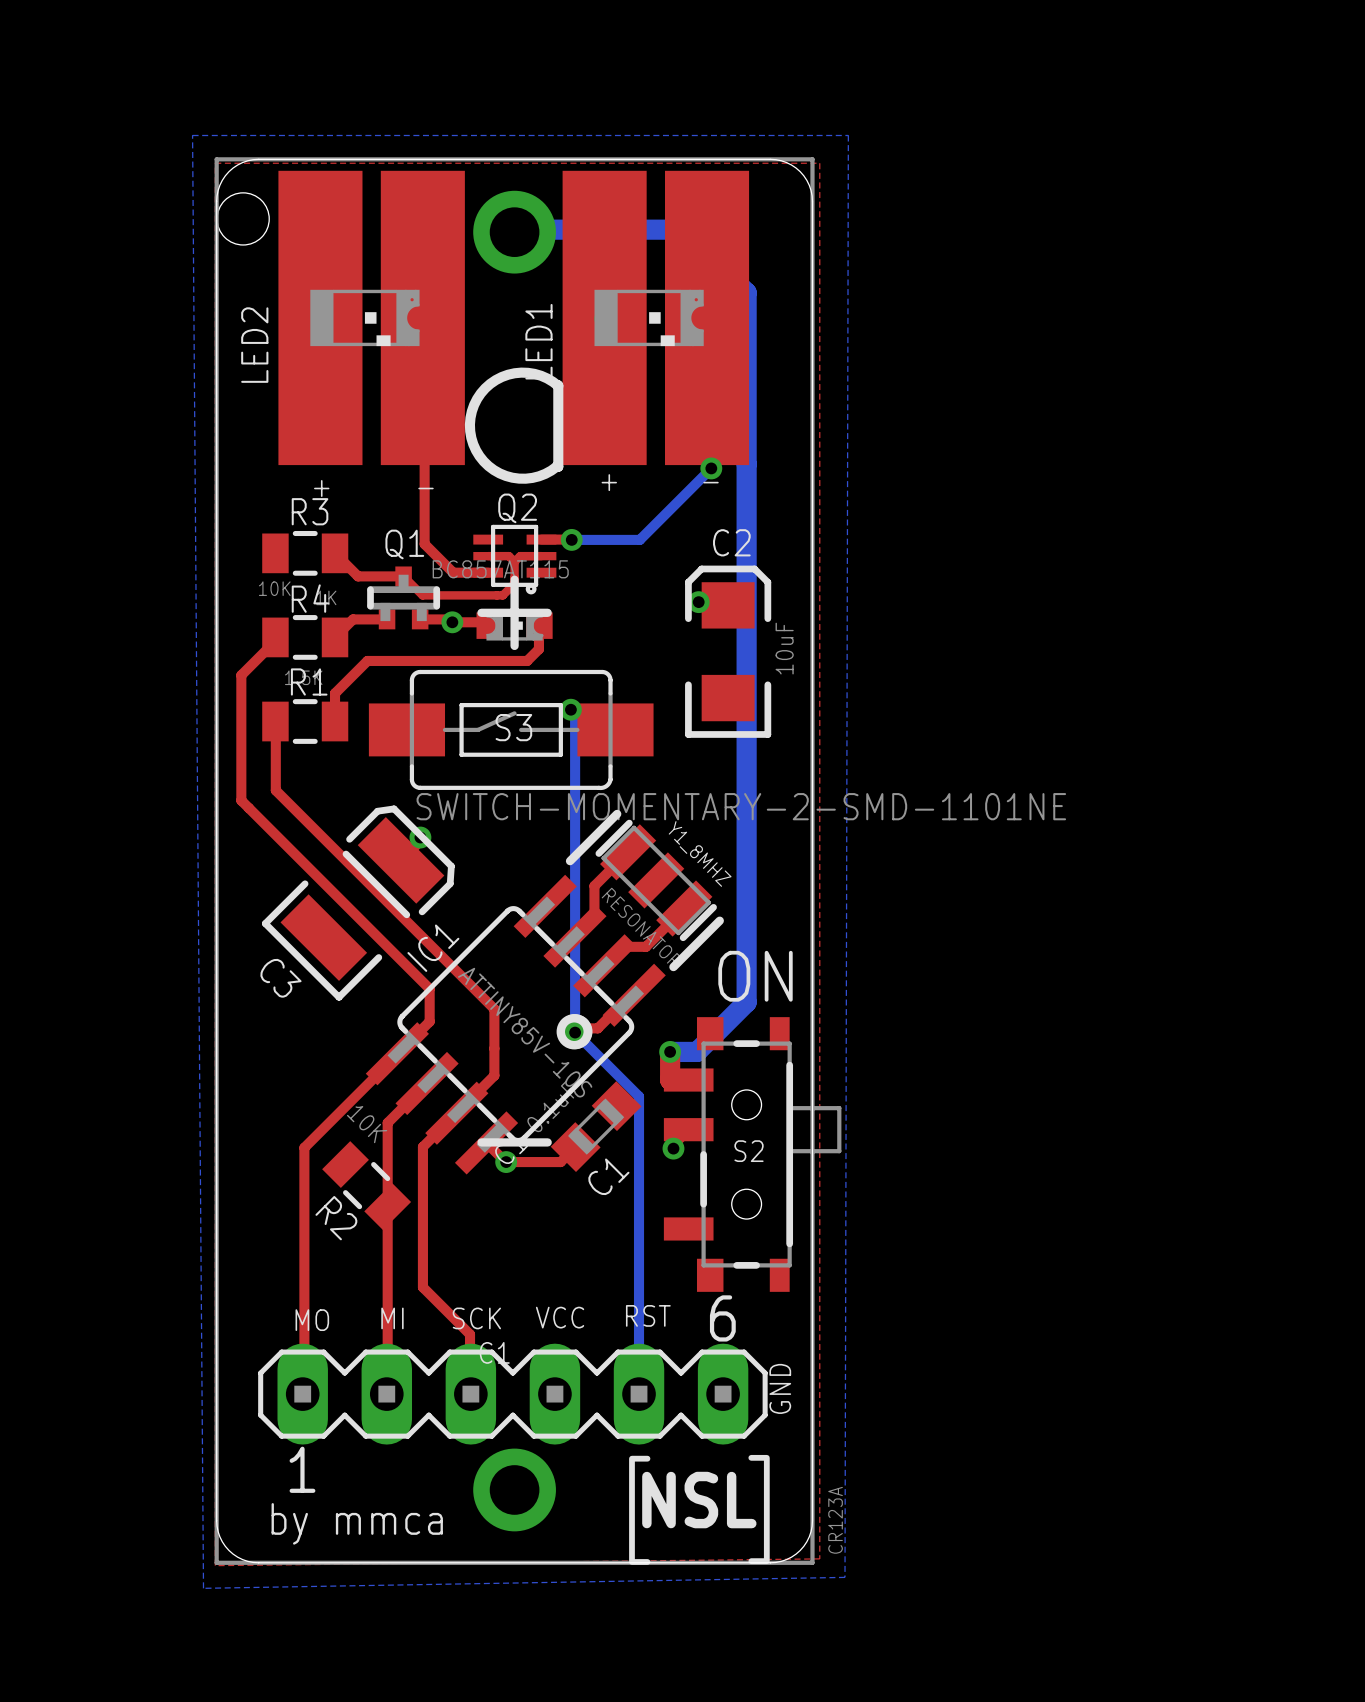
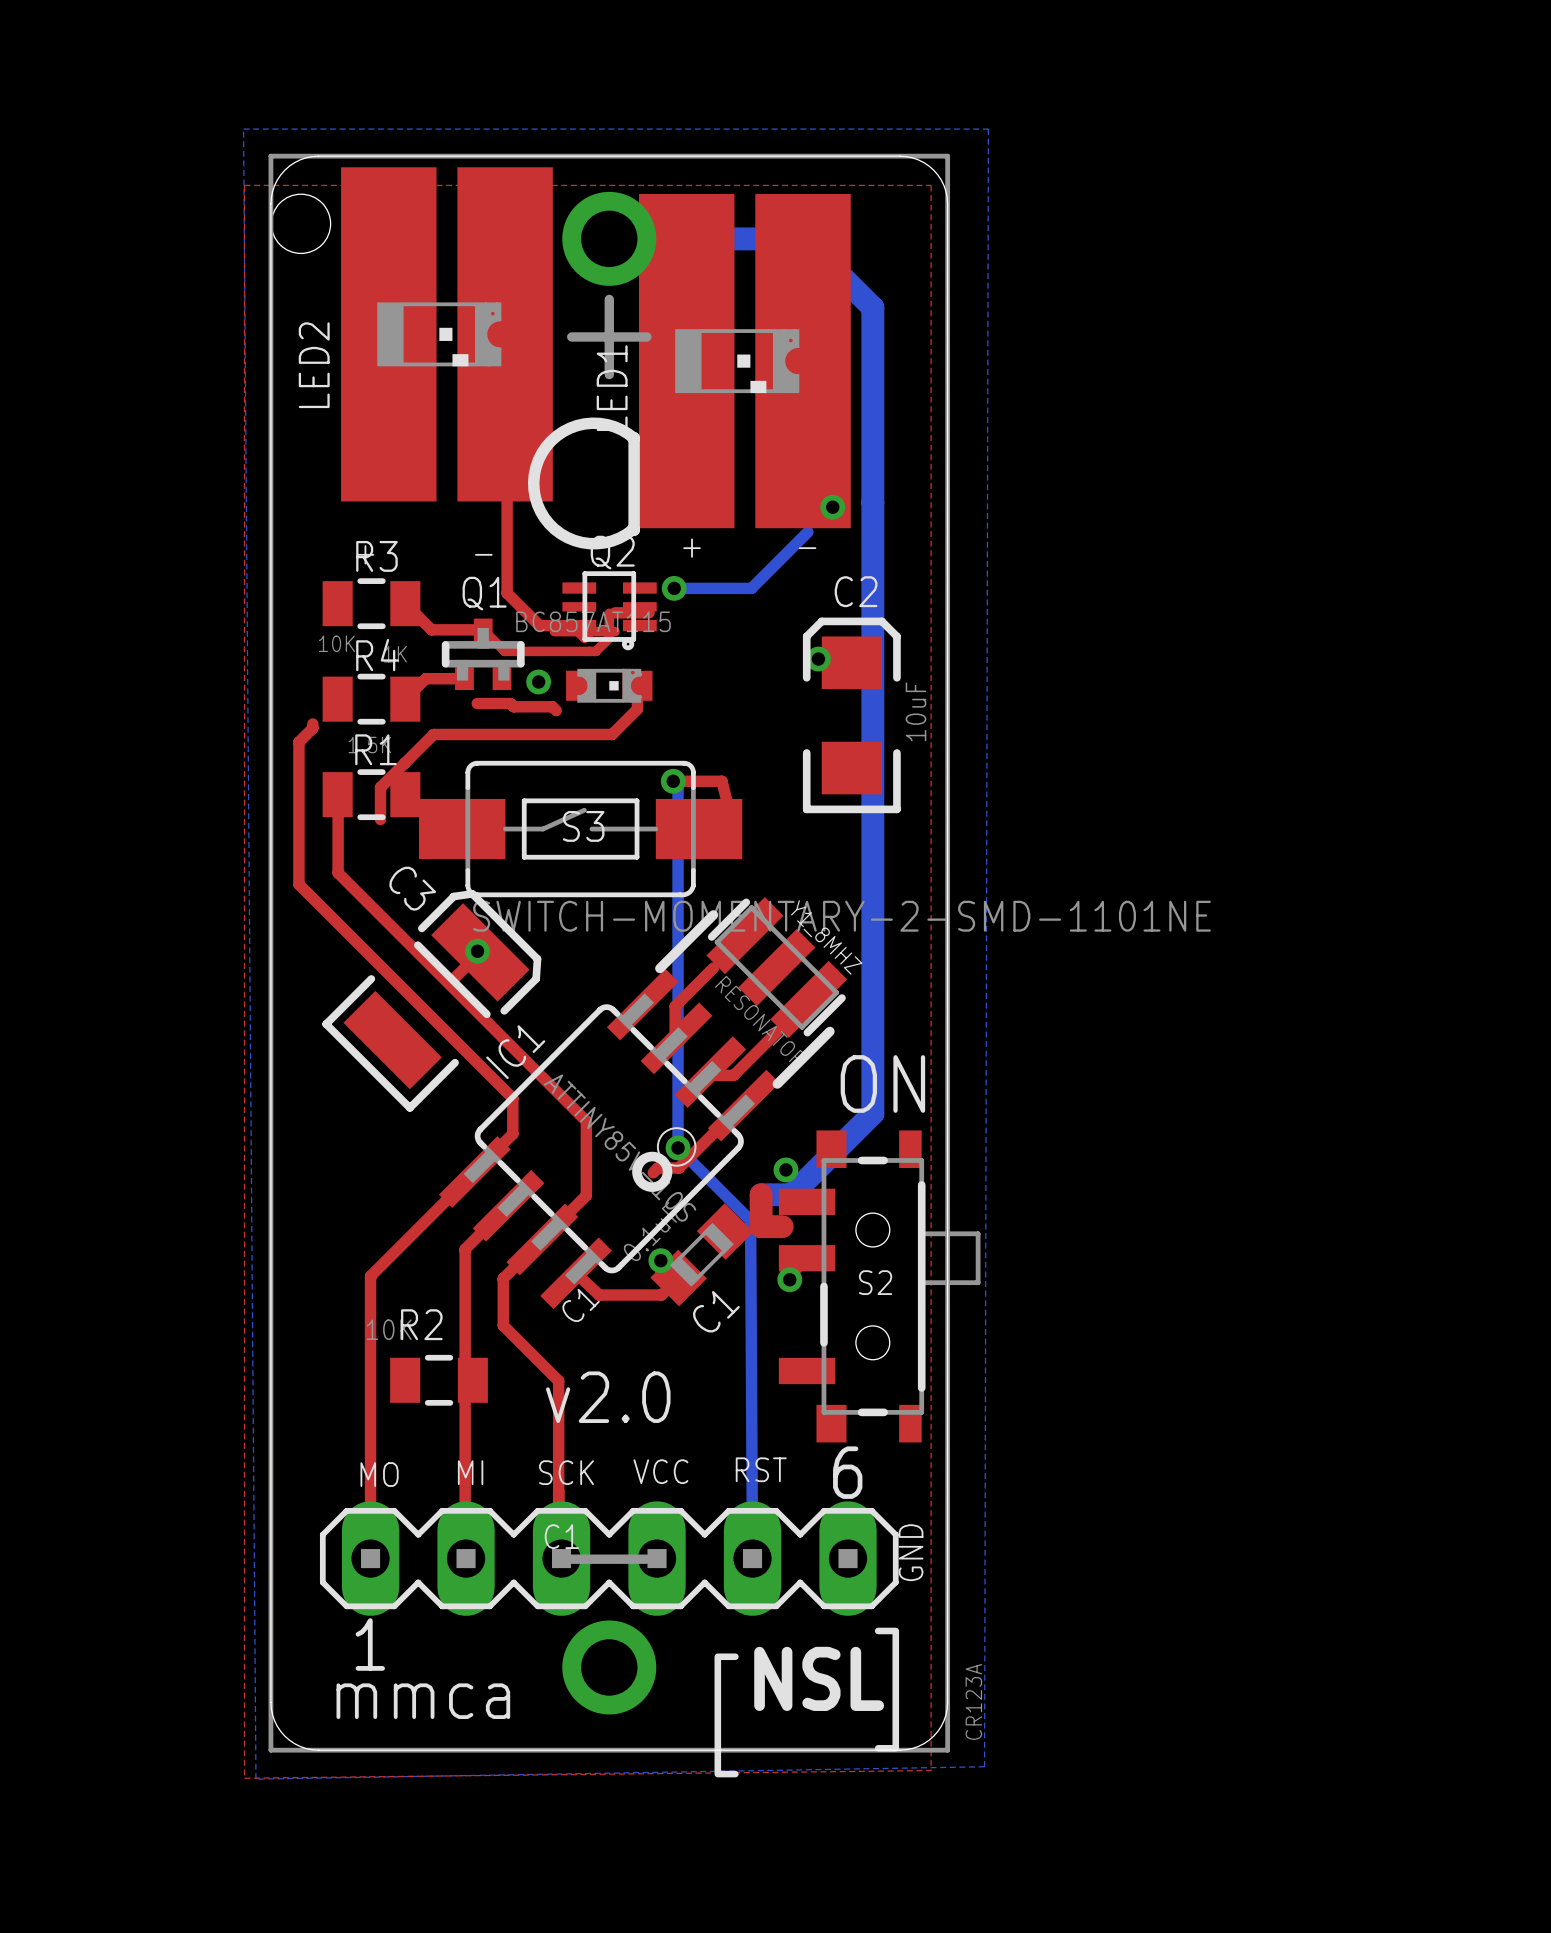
bottom zone outline: (192, 135) (848, 135) (845, 1577) (203, 1588) (192, 135) -> (243, 129) (988, 129) (984, 1766) (255, 1779) (243, 129)
part footprint: [214, 157, 815, 1565] -> [268, 153, 951, 1753]
board edge: (258, 159) (770, 159) (791, 164) (803, 175) (809, 185) (812, 201) (812, 1520) (806, 1541) (796, 1554) (786, 1559) (770, 1562) (258, 1562) (237, 1557) (225, 1546) (219, 1536) (216, 1520) (216, 201) (219, 185) (228, 171) (242, 162) (258, 159) -> (318, 156) (899, 156) (912, 157) (923, 162) (937, 174) (944, 185) (947, 203) (947, 1702) (946, 1714) (941, 1726) (928, 1740) (918, 1746) (899, 1750) (318, 1750) (306, 1748) (294, 1743) (280, 1731) (274, 1720) (270, 1702) (270, 203) (274, 185) (284, 170) (300, 159) (318, 156)
bottom track: (514, 232) (517, 229) (683, 229) (746, 292) (746, 1002) -> (609, 238) (804, 238) (872, 307) (872, 1113) (848, 1138)
top track: none -> (505, 334) (507, 380) (507, 593) (539, 625) (579, 625)
LED2 position: (371, 317) -> (446, 334)
top track: (422, 317) (424, 544) (453, 572) (488, 572) -> none
via position: (711, 468) -> (832, 507)
bottom track: (661, 518) (639, 539) (571, 539) -> (751, 588) (674, 588)
via position: (571, 539) -> (674, 588)
R3 position: (305, 553) -> (371, 603)
top track: (335, 553) (358, 576) (403, 576) (422, 595) (502, 595) (514, 583) (514, 561) -> (405, 603) (431, 629) (483, 629) (504, 651) (595, 651) (609, 638) (609, 613)
Q2 position: (514, 559) -> (609, 610)
Q1 position: (403, 597) -> (483, 654)
via position: (698, 602) -> (818, 659)
top track: (387, 619) (353, 619) (335, 637) -> (464, 678) (425, 678) (405, 699)
via position: (452, 622) -> (538, 681)
part position: (514, 625) -> (609, 685)
top track: (538, 626) (538, 649) (527, 660) (367, 660) -> (637, 685) (637, 709) (612, 734) (433, 734) (417, 750)
R4 position: (305, 637) -> (371, 699)
C2 position: (728, 651) -> (851, 715)
top track: (263, 653) (241, 675) (241, 800) (429, 988) (429, 1021) (304, 1147) (304, 1392) (302, 1394) -> (298, 742) (298, 884) (512, 1098) (512, 1133) (370, 1276) (370, 1558)
top track: none -> (673, 781) (721, 781) (727, 804)
bottom track: none -> (673, 781) (678, 786) (678, 1147) (750, 1220) (752, 1558)
top track: none -> (338, 795) (338, 872) (586, 1121) (586, 1195) (503, 1278) (503, 1325) (558, 1380) (558, 1557) (561, 1558)
bottom track: (570, 709) (575, 713) (575, 1032) (639, 1096) (639, 1394) -> none
via position: (570, 709) -> (673, 781)
top track: (275, 721) (275, 790) (494, 1009) (494, 1075) (422, 1146) (422, 1287) (470, 1334) (470, 1394) -> none
R1 position: (305, 721) -> (371, 794)
line: (617, 813) (570, 861) -> (713, 914) (659, 968)
Y1_8MHZ footprint: [595, 819, 717, 942] -> [706, 897, 848, 1038]
C3 position: (358, 903) -> (431, 1000)
line: (719, 920) (673, 967) -> (829, 1031) (777, 1083)
text position: ON (755, 976) -> ON (882, 1083)
C3 name position: C3 (280, 978) -> C3 (412, 888)
IC1 position: (515, 1024) -> (609, 1138)
via position: (575, 1032) -> (678, 1147)
via position: (670, 1051) -> (785, 1169)
top track: none -> (508, 1205) (465, 1249) (466, 1558)
top track: (427, 1083) (387, 1122) (386, 1394) -> none
top track: none -> (660, 1260) (660, 1278) (678, 1278) (661, 1295) (599, 1295) (576, 1273)
via: none -> (660, 1260)
C1 position: (596, 1126) -> (701, 1254)
top track: (486, 1142) (505, 1162) (560, 1162) (575, 1147) -> none
via position: (673, 1148) -> (789, 1279)
S2 position: (752, 1154) -> (879, 1286)
via: (506, 1162) -> none
R2 rotation: 0° (366, 1185) -> 45° counterclockwise (439, 1380)
R2 name position: R2 (336, 1218) -> R2 (421, 1324)
text: none -> v2.0 (608, 1397)
text position: RST (648, 1315) -> RST (761, 1469)
text position: VCC (560, 1317) -> VCC (660, 1471)
text position: MI (392, 1318) -> MI (470, 1472)
text position: SCK (476, 1318) -> SCK (566, 1472)
text position: MO (312, 1320) -> MO (379, 1474)
text position: GND (780, 1388) -> GND (911, 1552)
part position: (512, 1394) -> (609, 1558)
text position: NSL (699, 1500) -> NSL (819, 1678)
text position: ] (759, 1509) -> ] (886, 1689)
text: by mmca (357, 1523) -> mmca (423, 1701)

